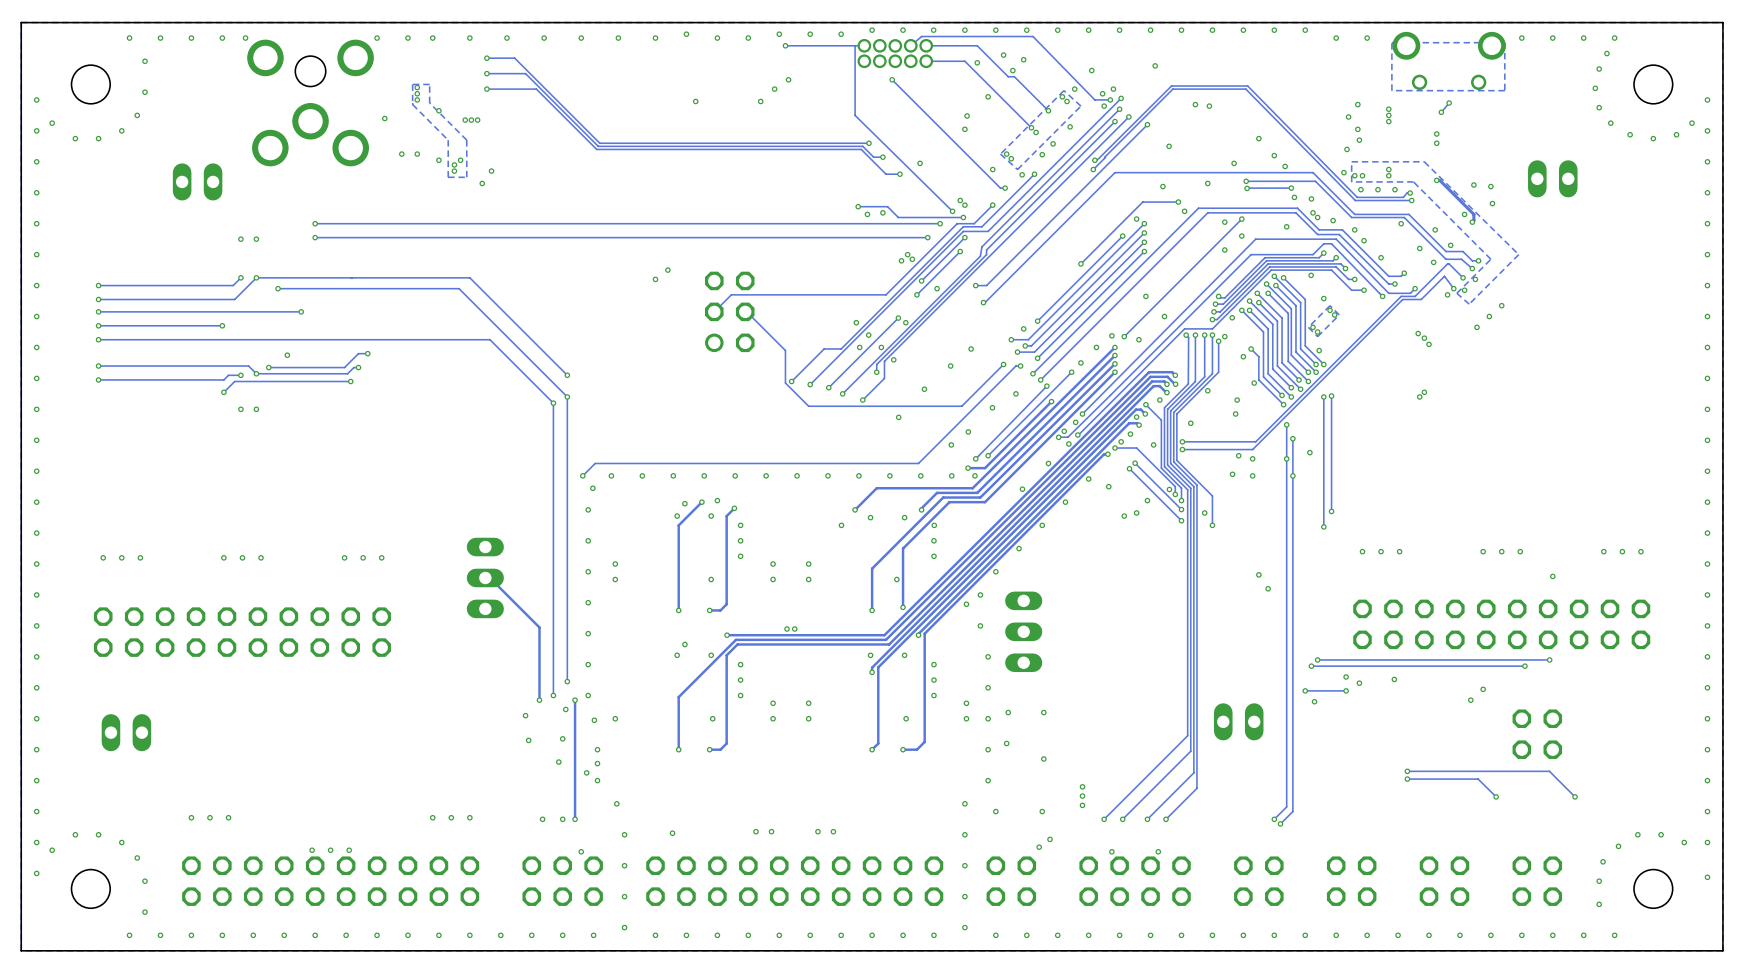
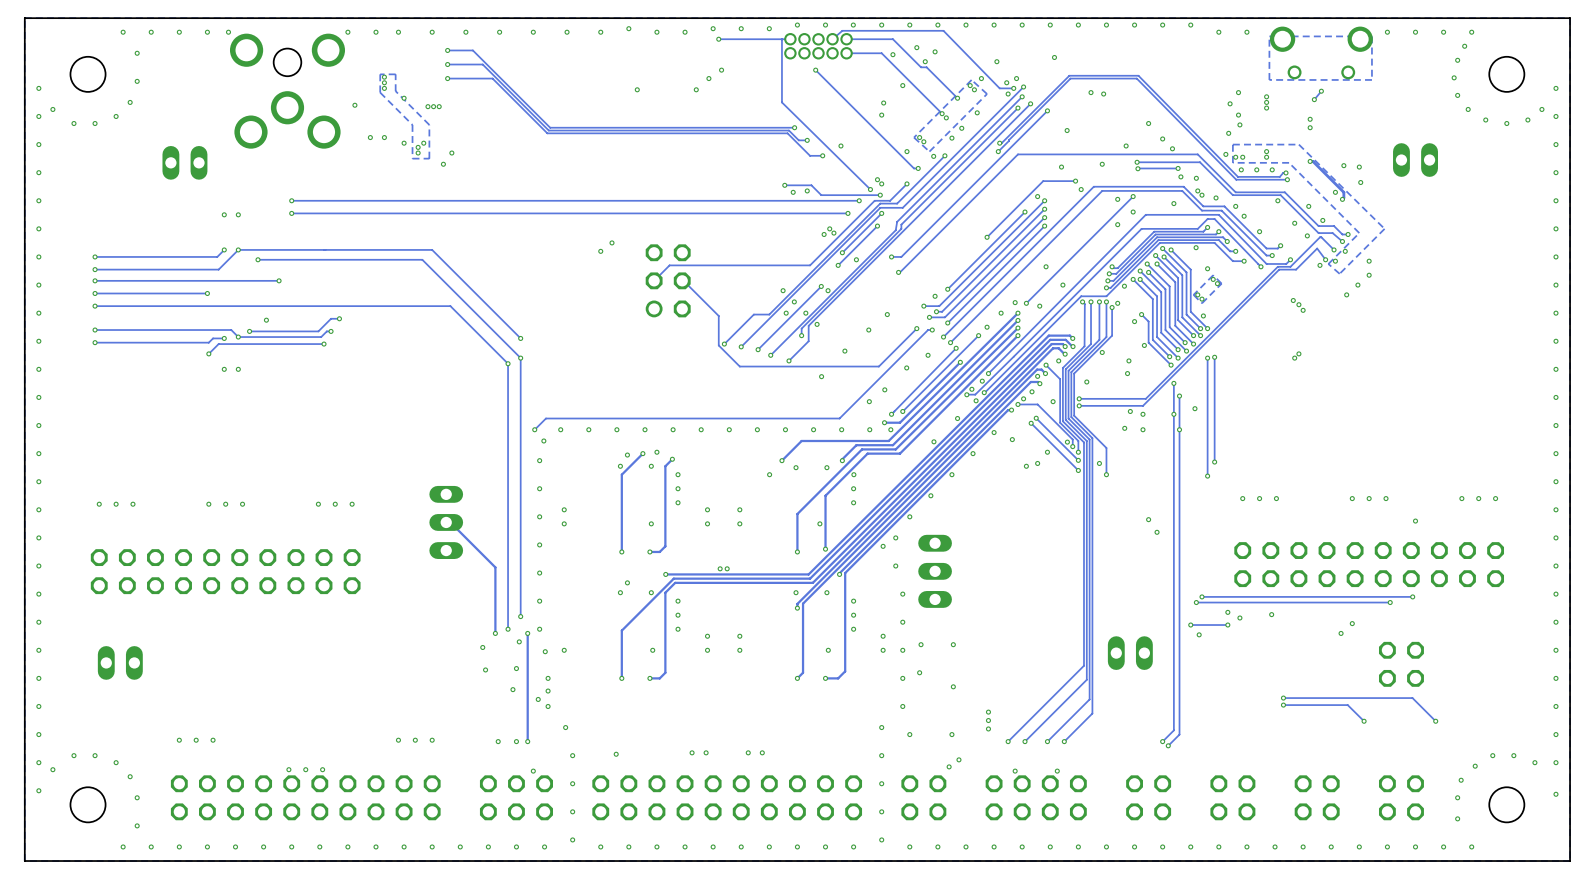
via: none -> (1369, 261)

